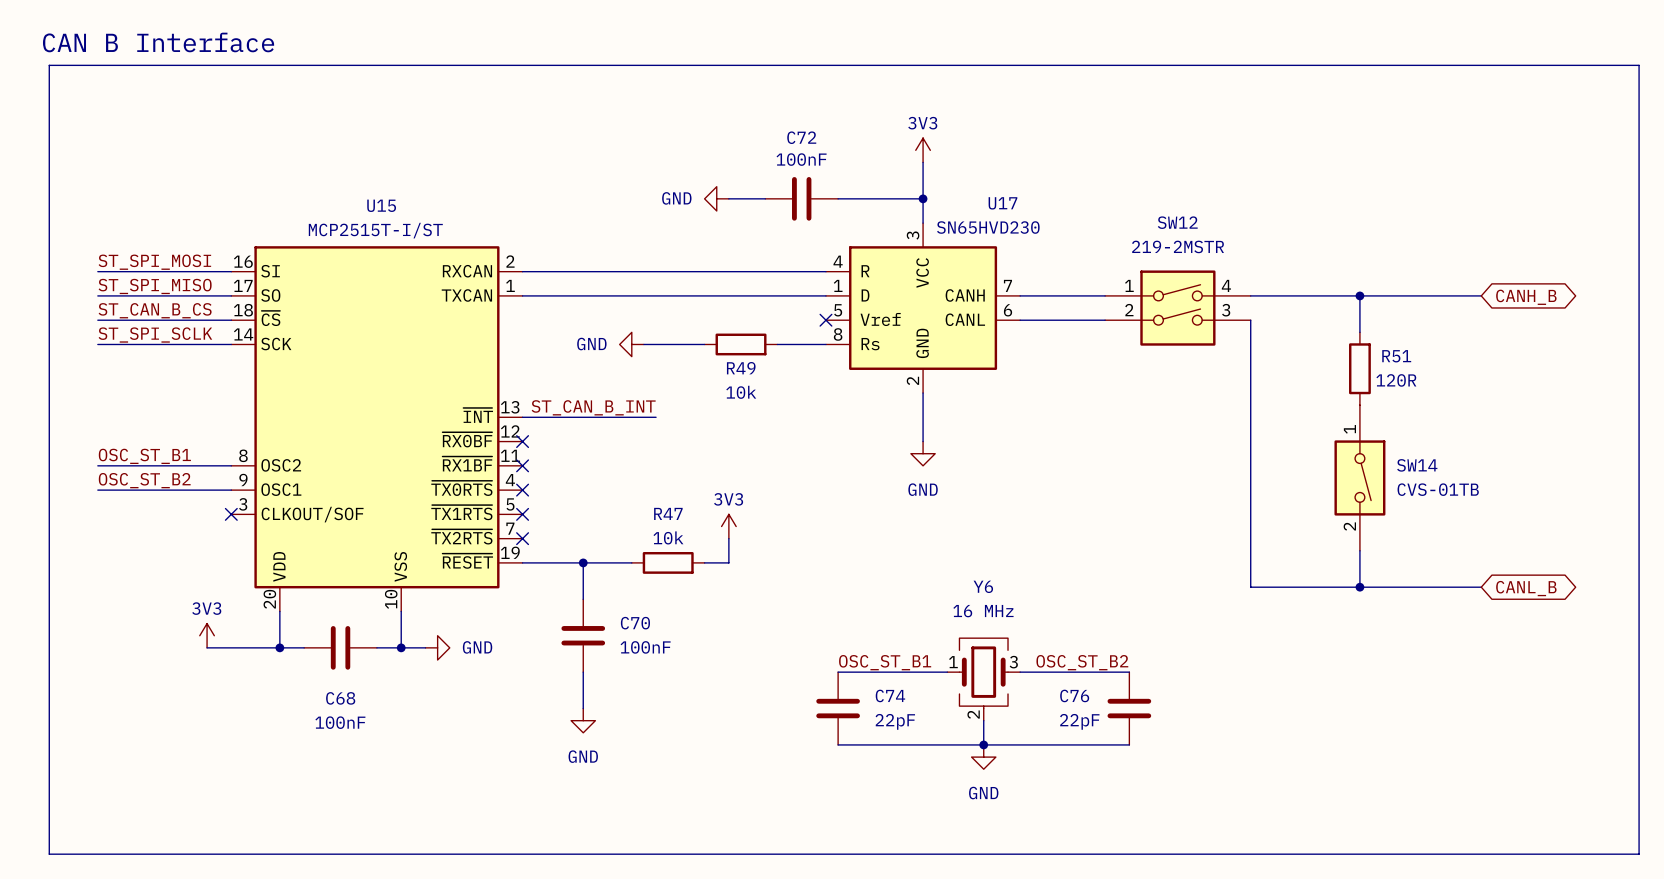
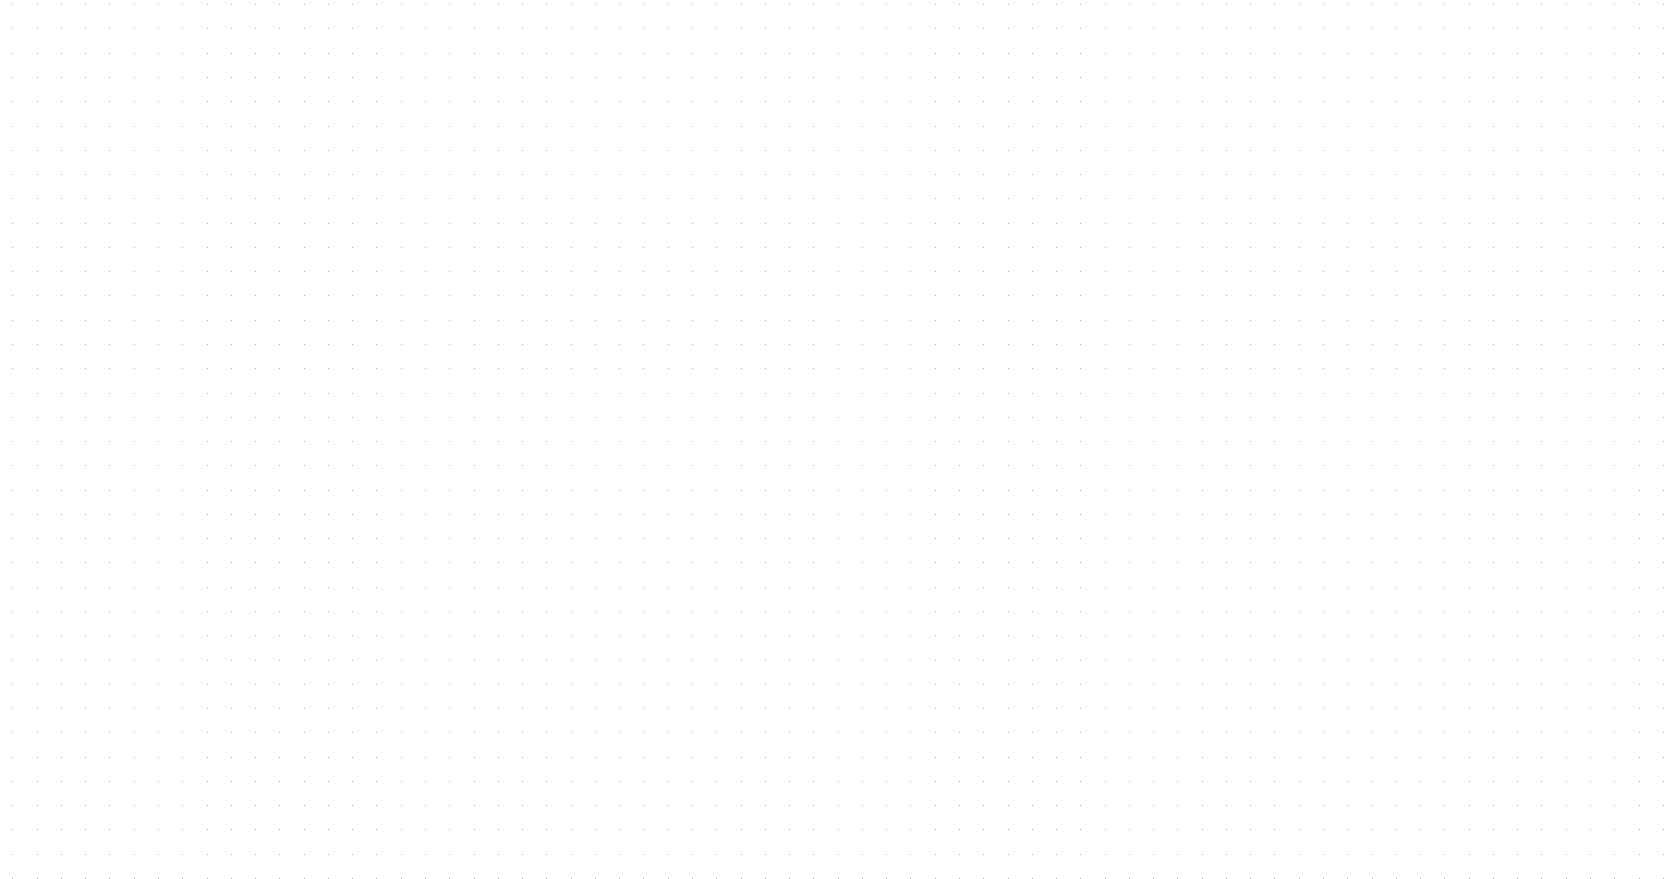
text: CAN B Interface (158, 42) -> none
line: (49, 65) (1639, 65) (1639, 854) (49, 854) (49, 65) -> none
power symbol: 3V3 (923, 150) -> none
wire: (923, 162) (923, 223) -> none
power symbol: GND (716, 198) -> none
wire: (728, 198) (765, 198) -> none
C72: 100nF (801, 198) -> none
wire: (838, 198) (923, 198) -> none
junction: (923, 198) -> none
label: ST_SPI_MOSI (154, 262) -> none
wire: (97, 271) (231, 271) -> none
wire: (522, 271) (825, 271) -> none
label: ST_SPI_MISO (155, 286) -> none
wire: (97, 295) (231, 295) -> none
wire: (522, 295) (825, 295) -> none
wire: (1020, 295) (1105, 295) -> none
wire: (1250, 295) (1481, 295) -> none
wire: (1359, 295) (1359, 332) -> none
junction: (1359, 295) -> none
global label: CANH_B (1526, 297) -> none
U17: SN65HVD230 (923, 308) -> none
SW12: 219-2MSTR (1177, 308) -> none
label: ST_CAN_B_CS (155, 310) -> none
wire: (97, 320) (231, 320) -> none
no-connect mark: (825, 320) -> none
wire: (1020, 320) (1105, 320) -> none
wire: (1250, 320) (1250, 587) (1481, 587) -> none
label: ST_SPI_SCLK (155, 335) -> none
wire: (97, 344) (231, 344) -> none
power symbol: GND (631, 344) -> none
wire: (643, 344) (704, 344) -> none
R49: 10k (741, 344) -> none
wire: (777, 344) (825, 344) -> none
R51: 120R (1359, 368) -> none
wire: (923, 393) (923, 441) -> none
label: ST_CAN_B_INT (593, 407) -> none
wire: (522, 417) (656, 417) -> none
U15: MCP2515T-I/ST (376, 428) -> none
no-connect mark: (522, 441) -> none
power symbol: GND (923, 453) -> none
label: OSC_ST_B1 (144, 456) -> none
wire: (97, 465) (231, 465) -> none
no-connect mark: (522, 465) -> none
SW14: CVS-01TB (1359, 477) -> none
label: OSC_ST_B2 (144, 480) -> none
wire: (97, 490) (231, 490) -> none
no-connect mark: (522, 490) -> none
no-connect mark: (231, 514) -> none
no-connect mark: (522, 514) -> none
power symbol: 3V3 (728, 526) -> none
no-connect mark: (522, 538) -> none
wire: (728, 538) (728, 562) (704, 562) -> none
wire: (1359, 550) (1359, 587) -> none
wire: (522, 562) (631, 562) -> none
wire: (583, 562) (583, 599) -> none
junction: (583, 562) -> none
R47: 10k (668, 562) -> none
junction: (1359, 587) -> none
global label: CANL_B (1526, 588) -> none
wire: (279, 611) (279, 647) -> none
wire: (401, 611) (401, 647) -> none
power symbol: 3V3 (207, 635) -> none
C70: 100nF (583, 635) -> none
wire: (207, 647) (304, 647) -> none
junction: (279, 647) -> none
C68: 100nF (340, 647) -> none
wire: (376, 647) (425, 647) -> none
junction: (401, 647) -> none
power symbol: GND (437, 647) -> none
label: OSC_ST_B1 (885, 662) -> none
label: OSC_ST_B2 (1082, 662) -> none
wire: (583, 672) (583, 708) -> none
wire: (838, 672) (947, 672) -> none
wire: (1020, 672) (1129, 672) -> none
Y6: 16 MHz (983, 679) -> none
C74: 22pF (838, 708) -> none
C76: 22pF (1129, 708) -> none
power symbol: GND (583, 720) -> none
wire: (983, 720) (983, 744) -> none
wire: (838, 744) (1129, 744) -> none
junction: (983, 744) -> none
power symbol: GND (983, 757) -> none

